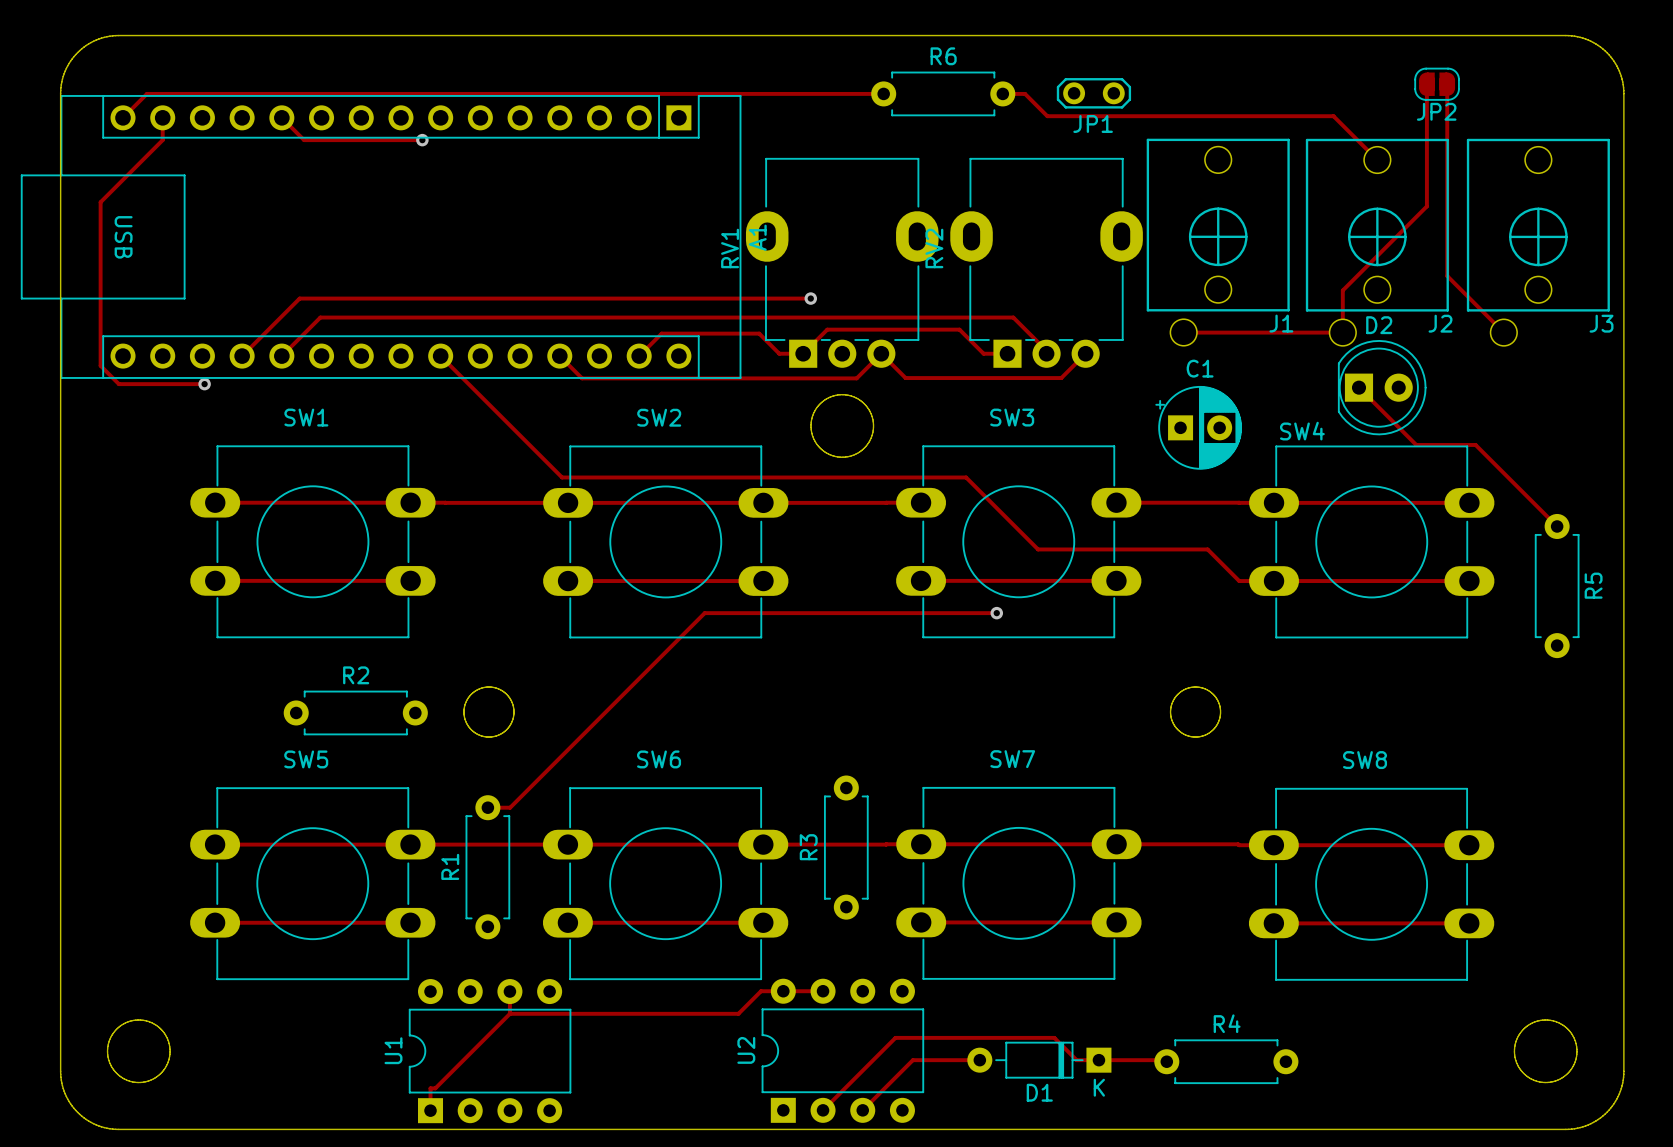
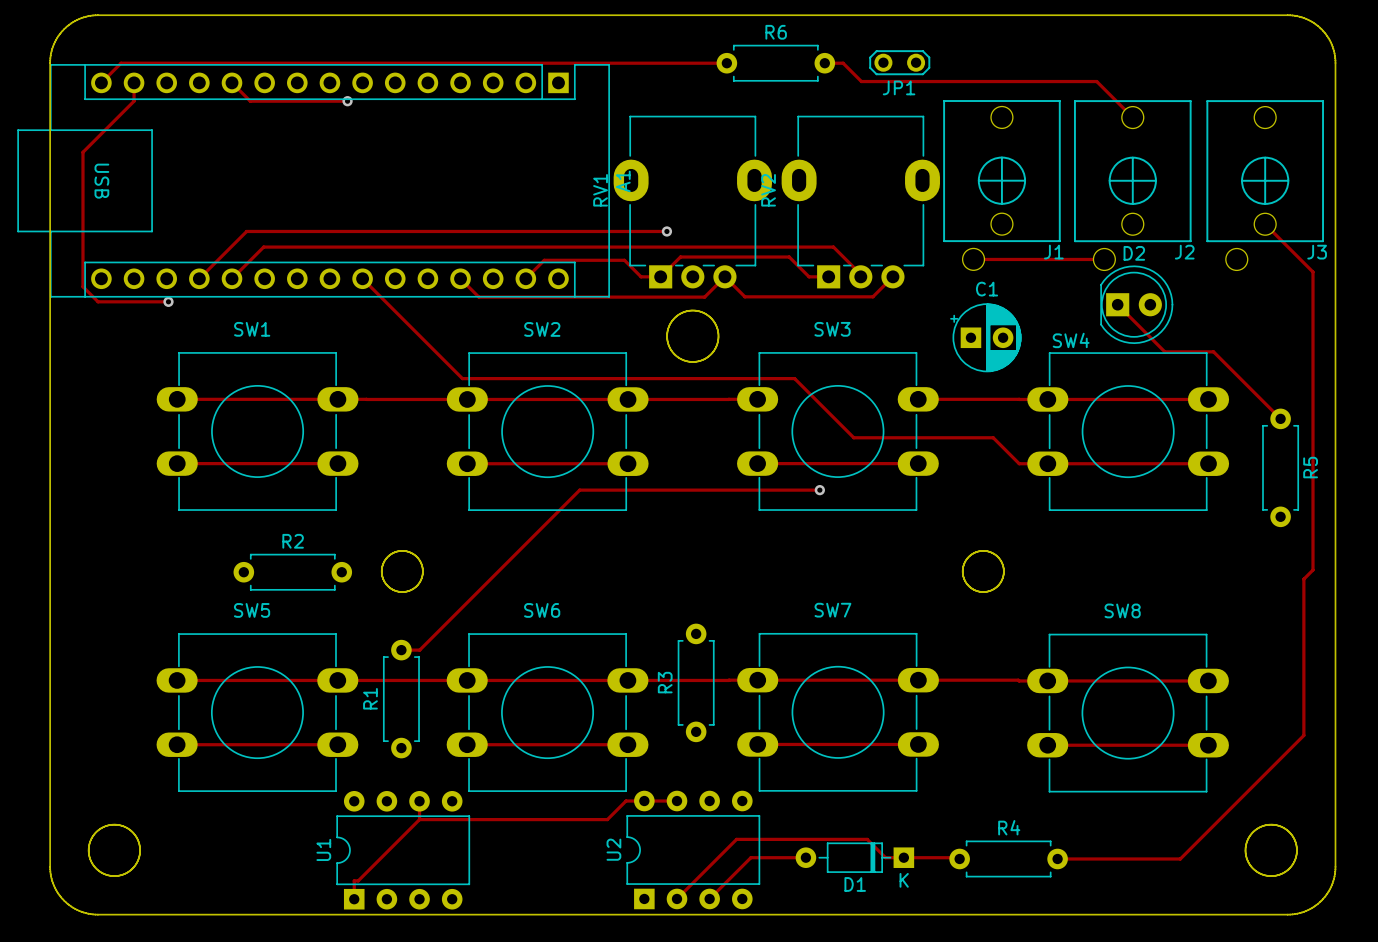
track: (1426, 84) (1426, 206) (1342, 290) (1342, 332) -> none
JP2: (1437, 84) -> none
track: (1447, 84) (1447, 276) (1503, 332) -> none
track: none -> (1265, 224) (1313, 272) (1313, 570) (1303, 579) (1303, 735) (1180, 858) (1057, 858)

